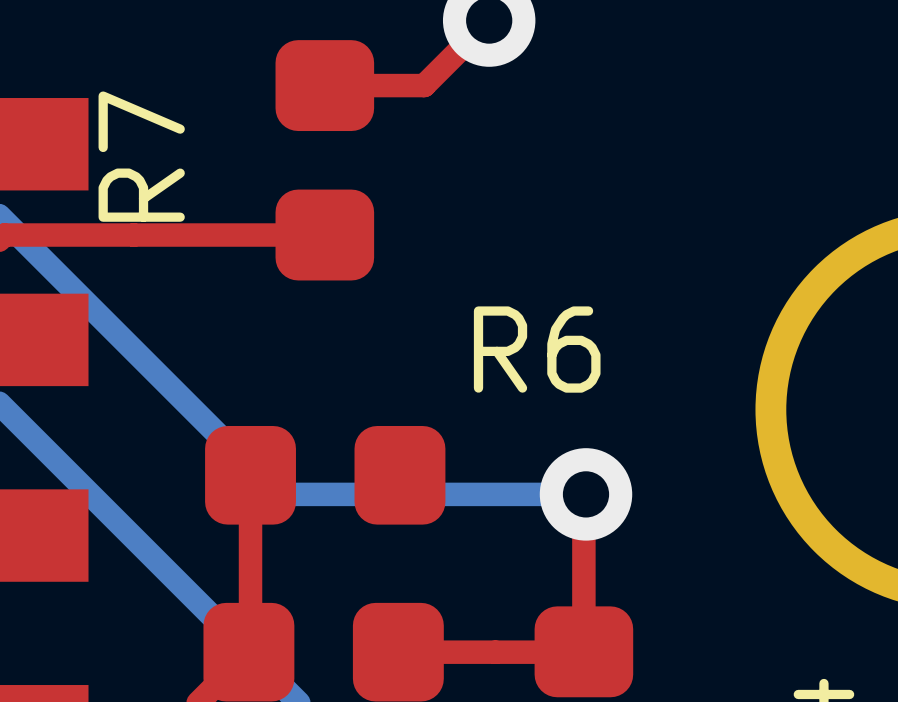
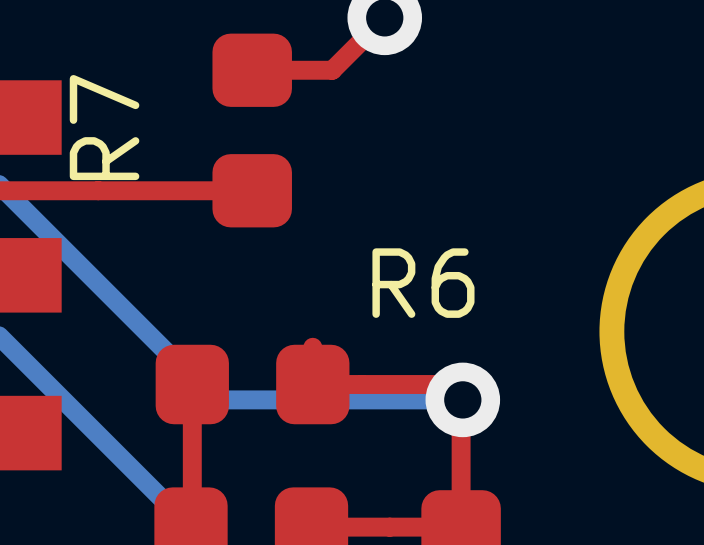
top track: none -> (312, 347) (312, 384) (452, 384)

